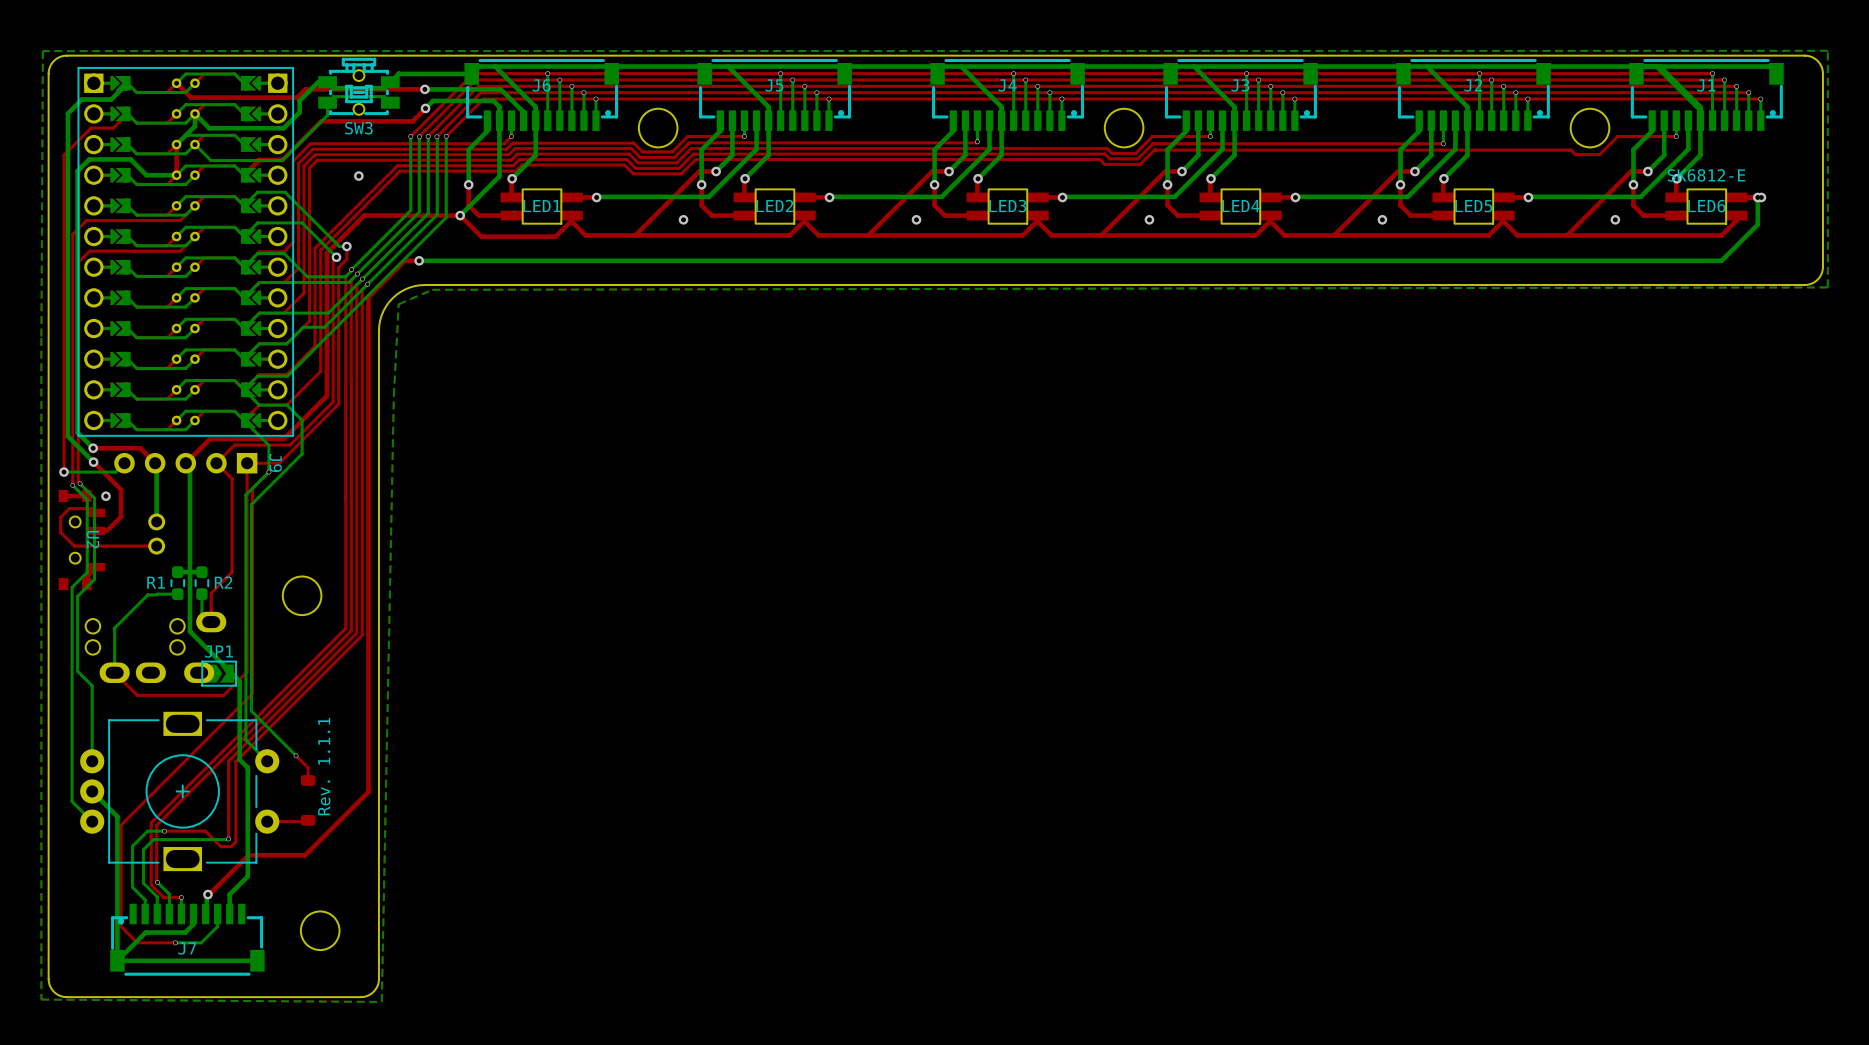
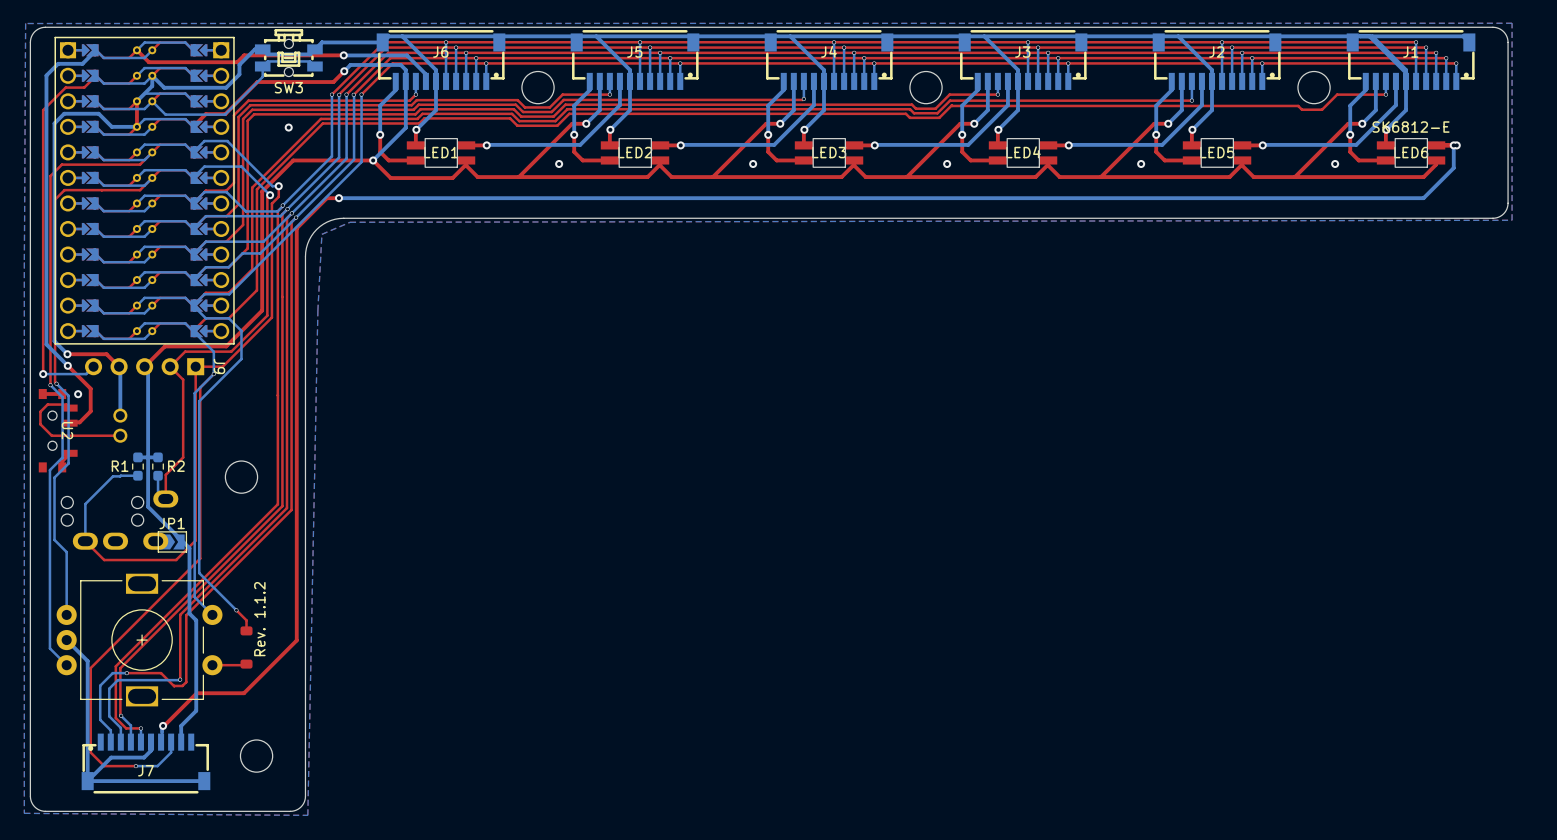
text: Rev. 1.1.1 (324, 766) -> Rev. 1.1.2 (259, 619)

